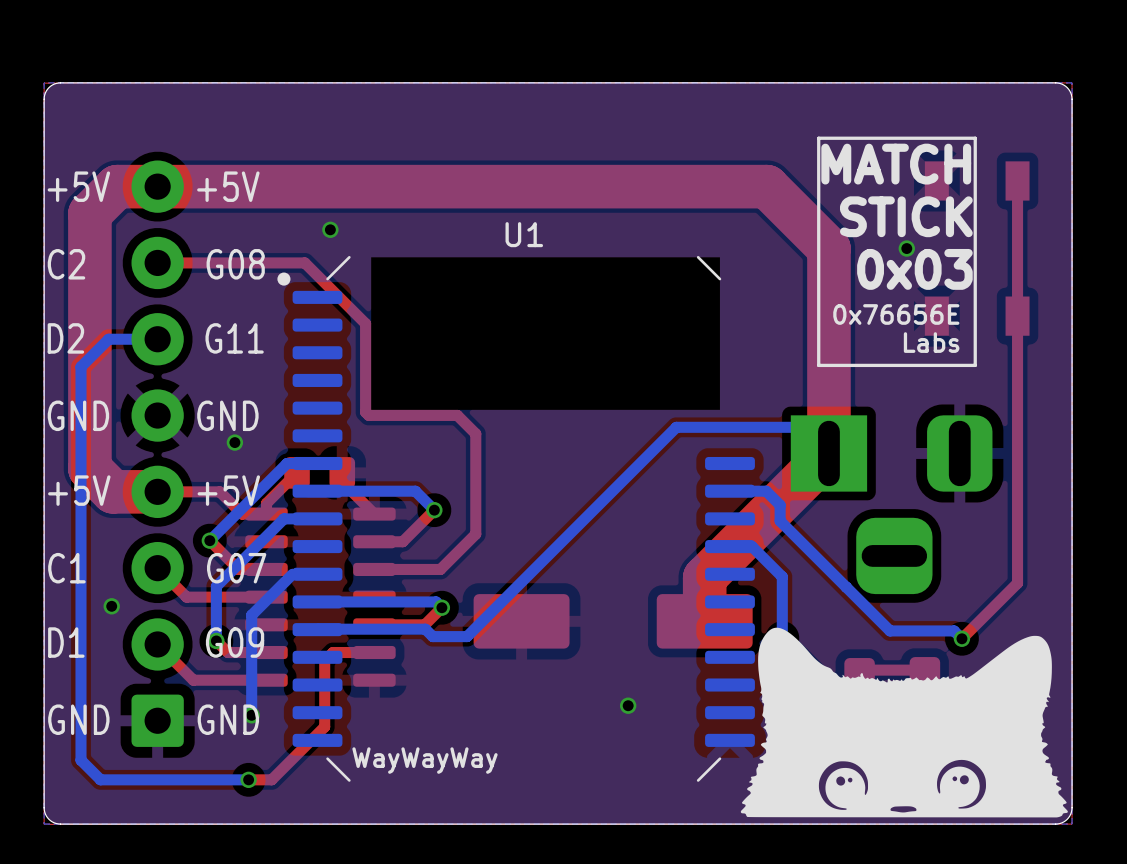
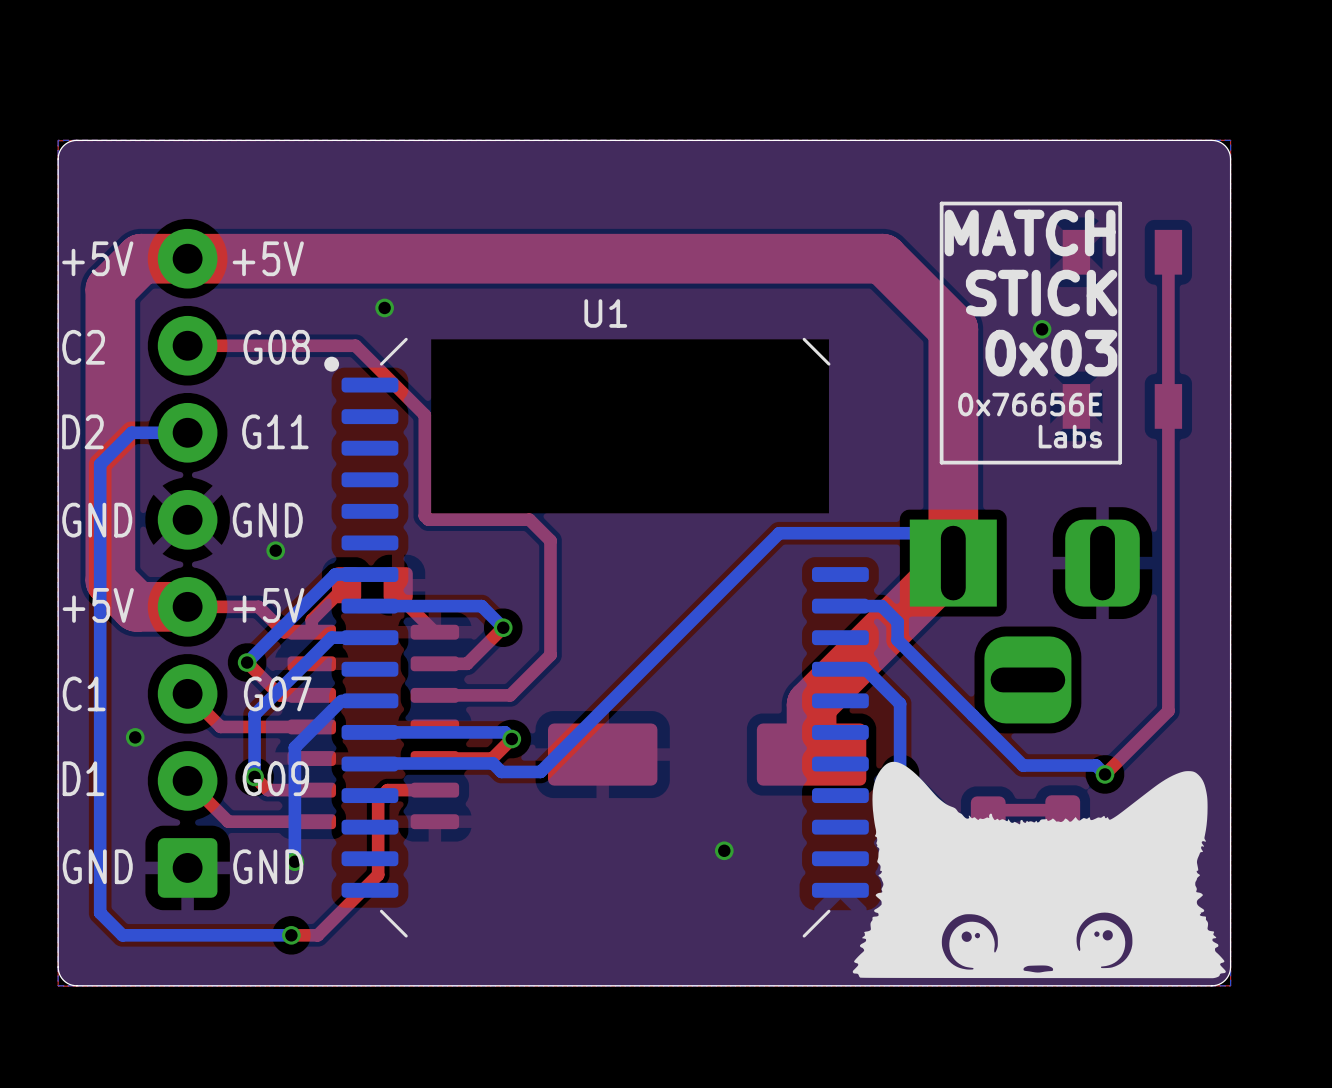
text: WayWayWay (425, 760) -> none

